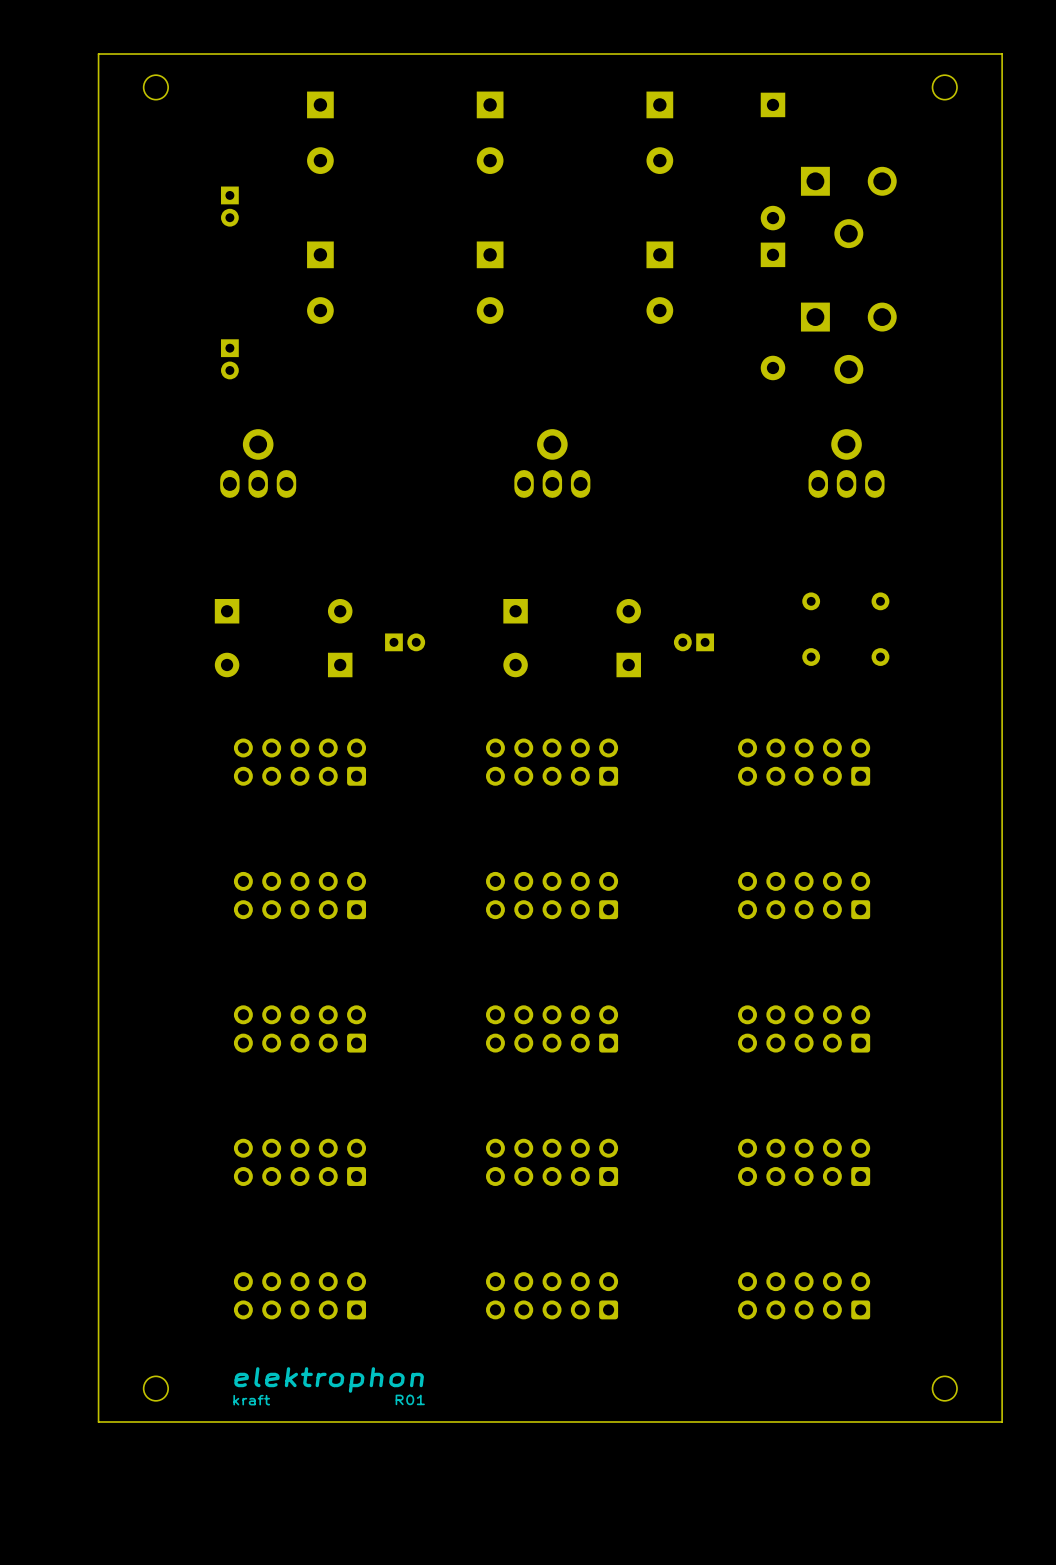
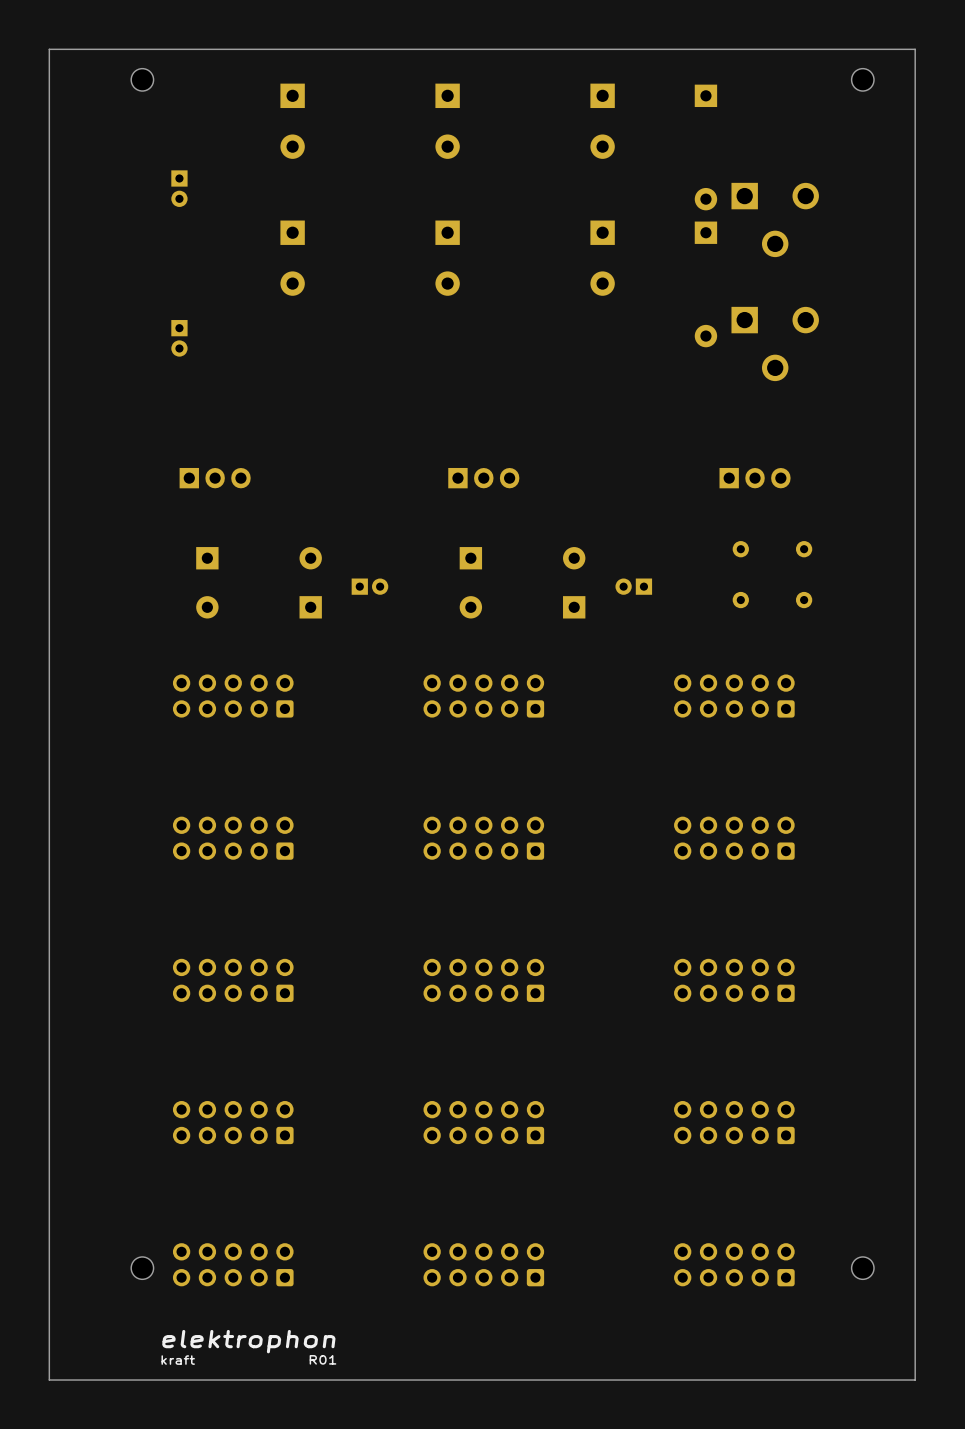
board edge: (98, 54) (98, 1422) (1002, 1422) -> (90, 49) (49, 49) (49, 1380) (915, 1380) (915, 1298)
part position: (229, 206) -> (179, 188)
part position: (848, 207) -> (775, 219)
part position: (848, 343) -> (775, 343)
part position: (229, 359) -> (179, 338)
part: (258, 463) -> none
part: (552, 463) -> none
part: (846, 463) -> none
part: none -> (215, 478)
part: none -> (483, 478)
part: none -> (755, 478)
part position: (299, 762) -> (233, 696)
part position: (552, 762) -> (483, 696)
part position: (299, 895) -> (233, 838)
part position: (552, 895) -> (483, 838)
part position: (804, 895) -> (734, 838)
part: (299, 1028) -> none
part: (552, 1028) -> none
part: (804, 1028) -> none
part: none -> (233, 980)
part: none -> (483, 980)
part: none -> (734, 980)
part: (299, 1162) -> none
part: (552, 1162) -> none
part: (804, 1162) -> none
part: none -> (233, 1122)
part: none -> (483, 1122)
part: none -> (734, 1122)
part: (299, 1295) -> none
part: (552, 1295) -> none
part: (804, 1295) -> none
part: none -> (233, 1264)
part: none -> (483, 1264)
part: none -> (734, 1264)
drawing position: (329, 1386) -> (248, 1347)

